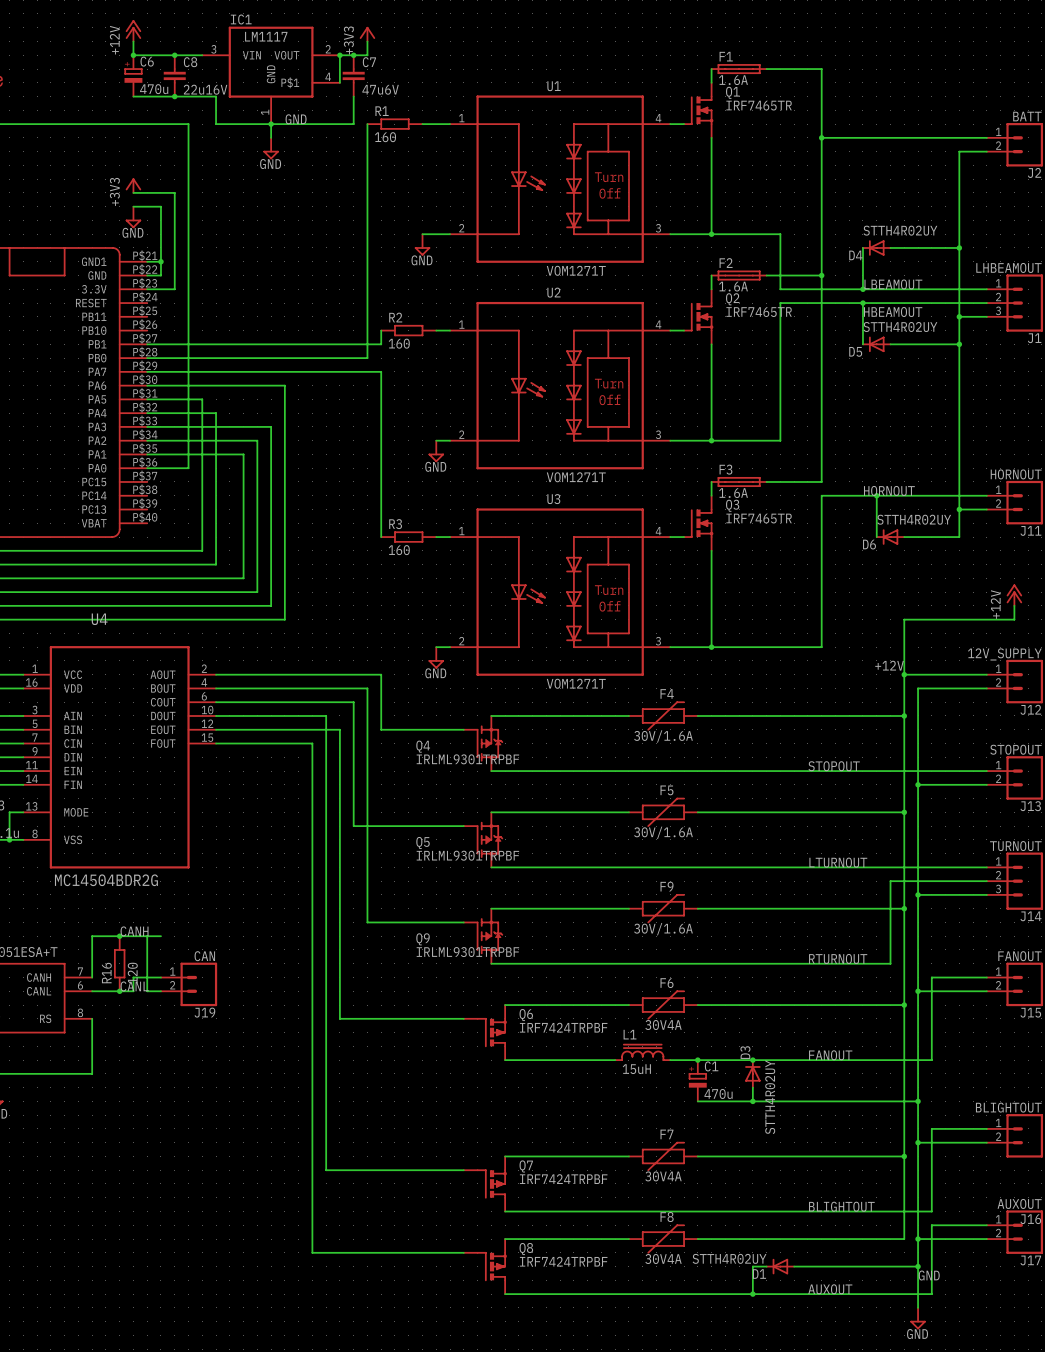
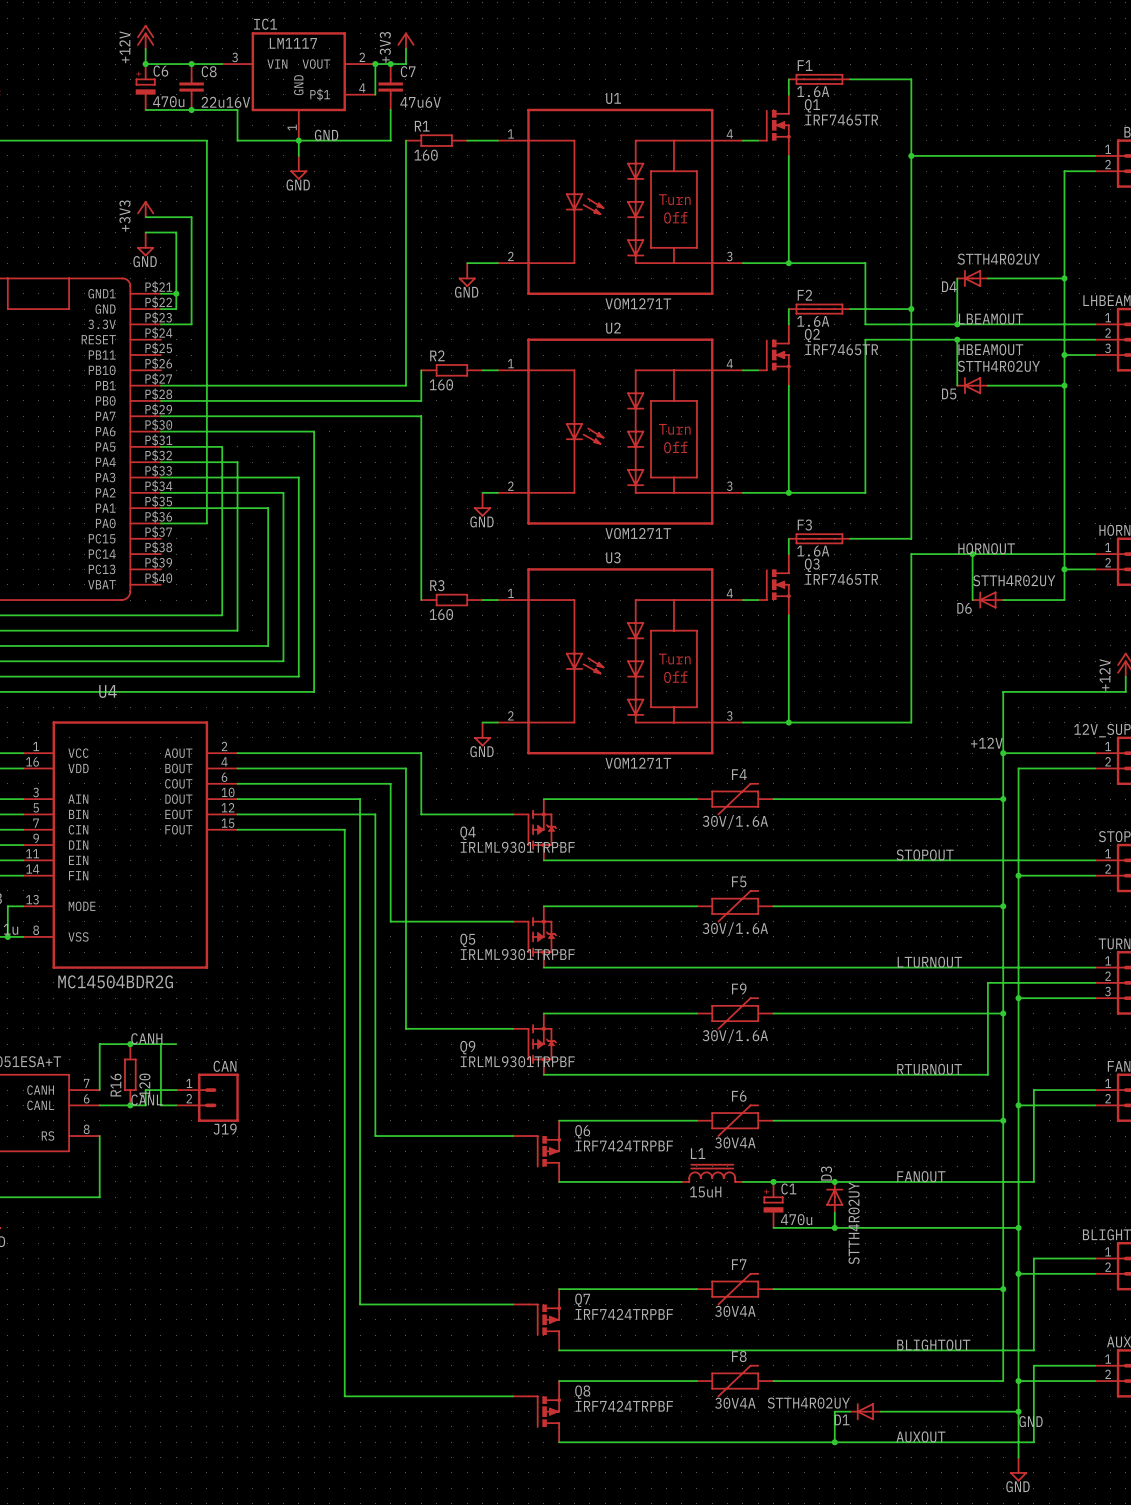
wire: (381, 344) (367, 344) (367, 358) -> (421, 385) (421, 400) (405, 400)

